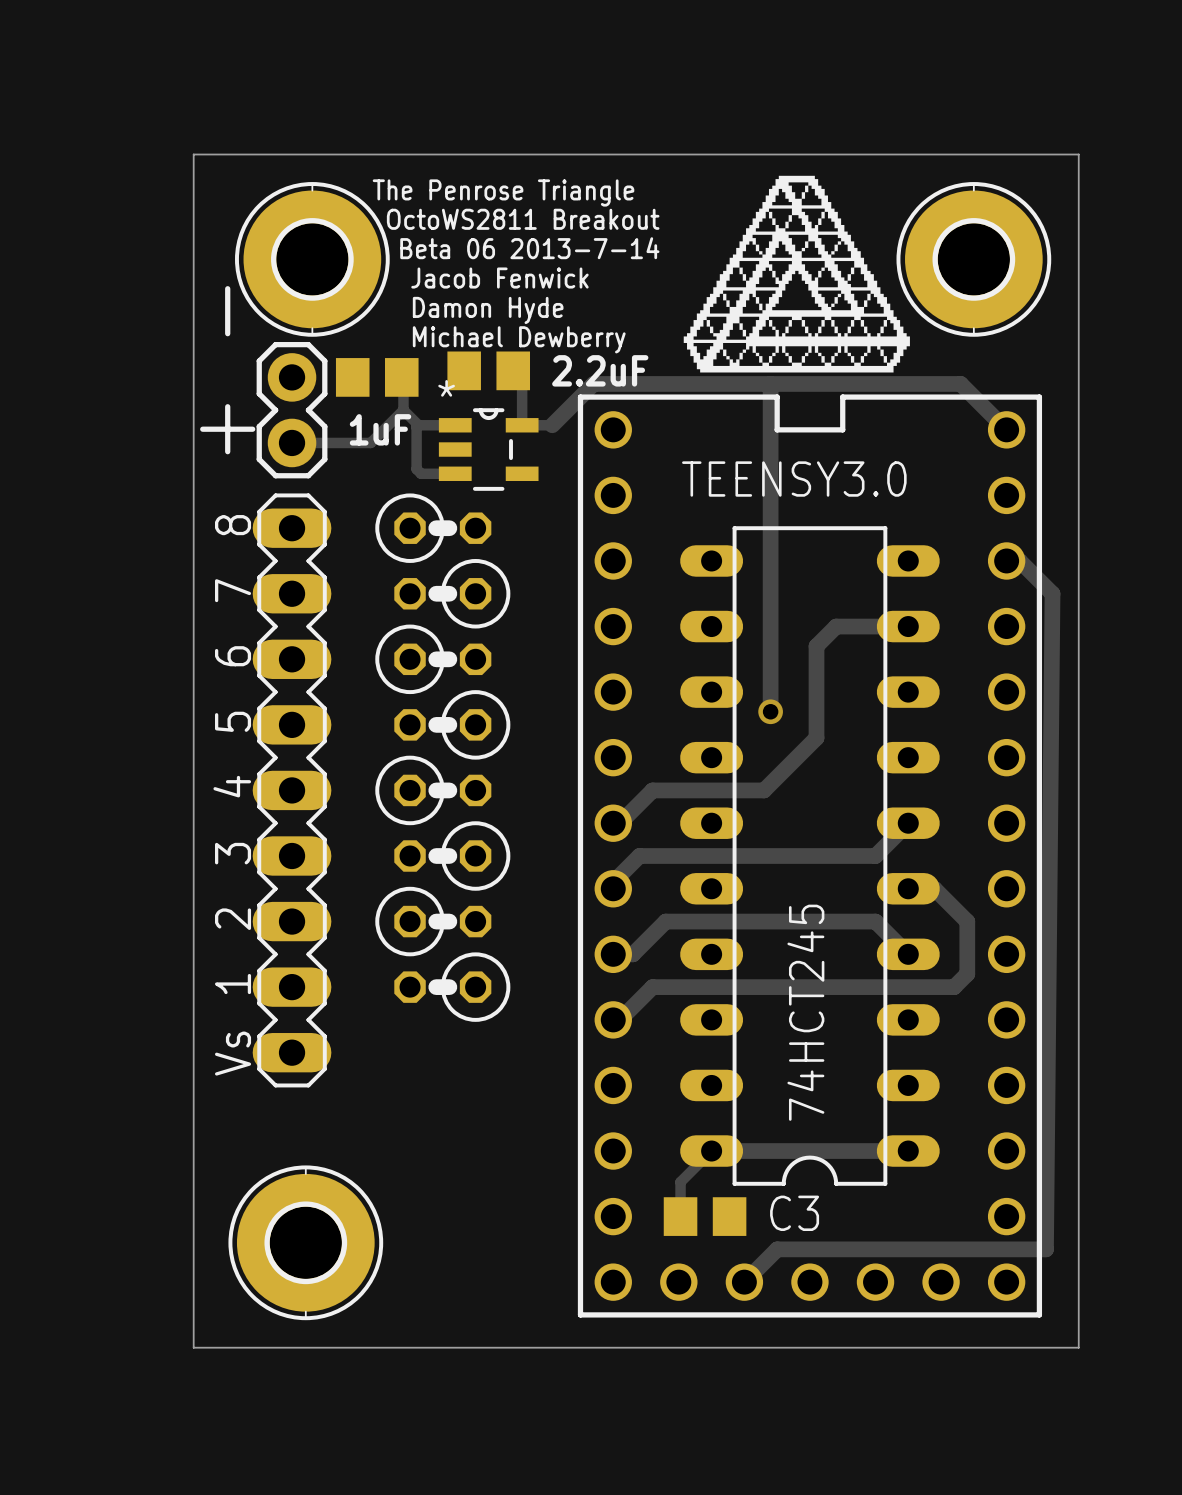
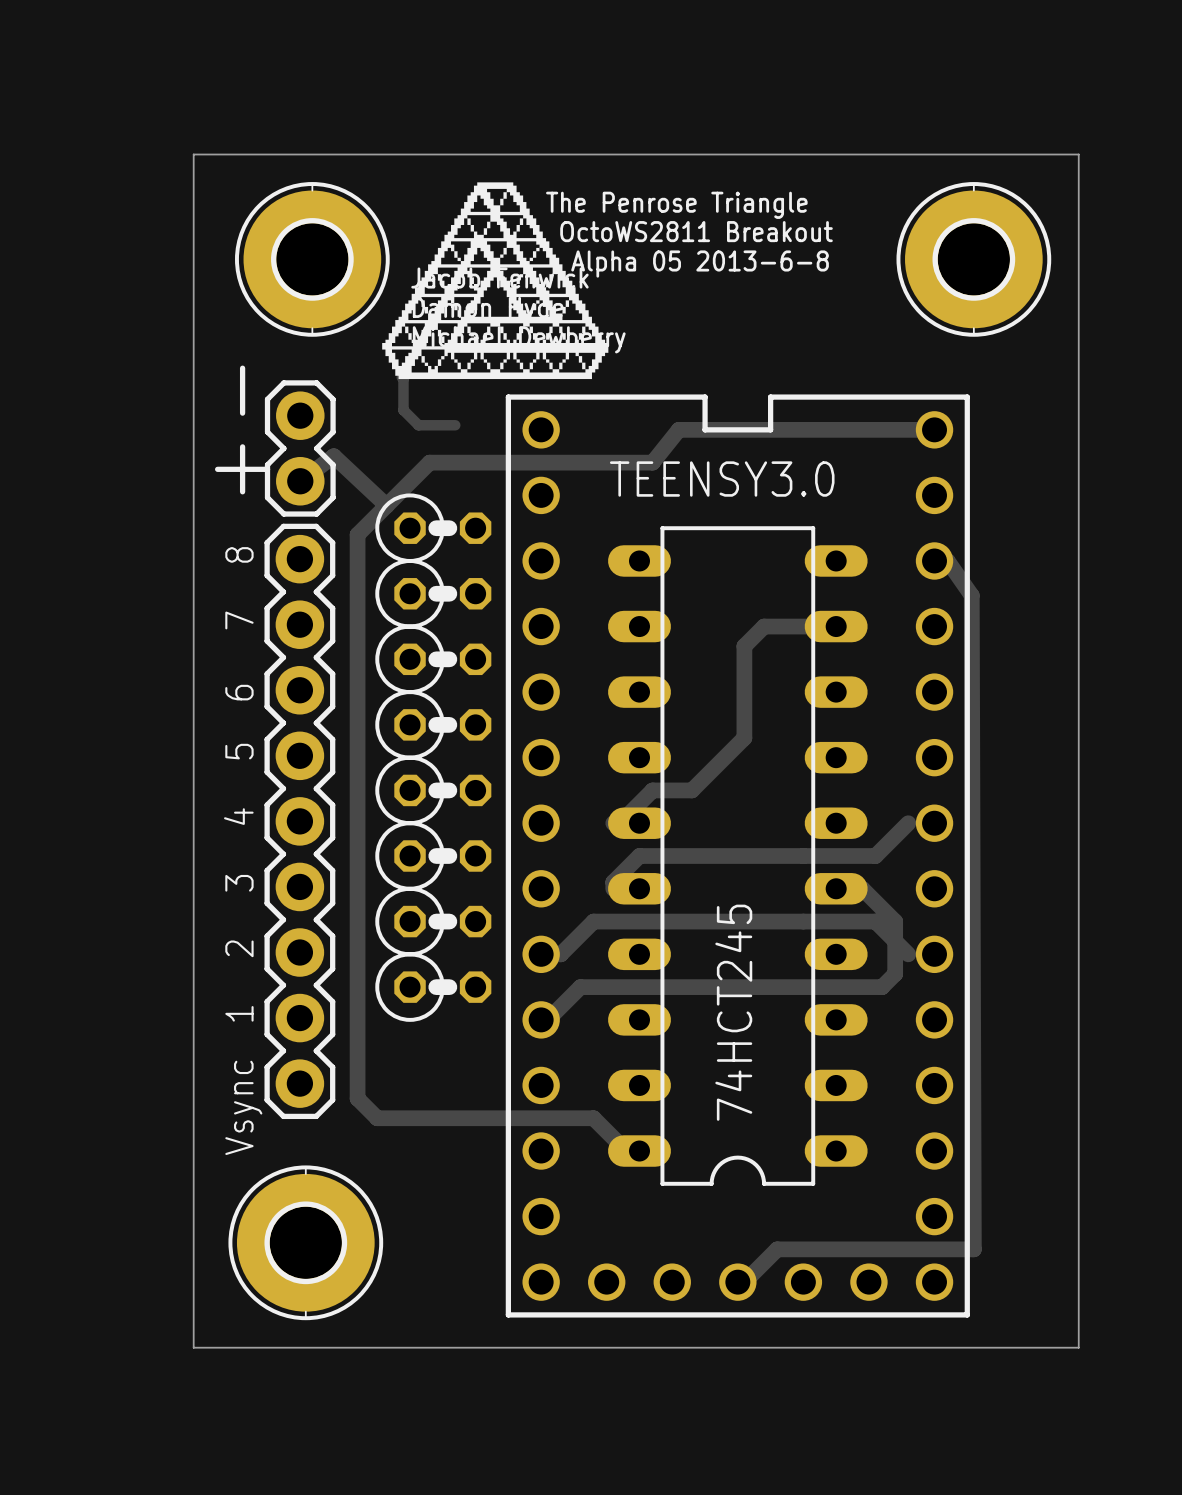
text position: The Penrose Triangle (503, 192) -> The Penrose Triangle (676, 205)
text position: OctoWS2811 Breakout (523, 219) -> OctoWS2811 Breakout (696, 231)
text: Beta 06 2013-7-14 (529, 248) -> Alpha 05 2013-6-8 (700, 264)
drawing position: (796, 274) -> (495, 280)
text: + - (227, 370) -> none
part: 2.2uF (488, 370) -> none
track: (513, 370) (522, 379) (522, 425) (552, 425) (593, 383) (960, 383) (1006, 429) -> none
part: 1uF (377, 377) -> none
track: (770, 383) (770, 711) -> none
text: none -> - (242, 390)
part position: (292, 410) -> (300, 448)
track: (403, 410) (370, 442) (292, 442) -> none
track: (418, 425) (416, 427) (416, 469) (421, 473) (455, 473) -> none
track: none -> (934, 429) (678, 429) (652, 462) (429, 462) (357, 534) (357, 1098) (377, 1118) (593, 1118) (626, 1151) (639, 1151)
part: (488, 449) -> none
text: none -> + (242, 469)
track: none -> (300, 481) (333, 456) (386, 505)
text: none -> 8 (239, 554)
track: (1006, 560) (1019, 560) (1052, 593) (1045, 1249) (973, 1249) -> (934, 560) (947, 560) (971, 595) (973, 1249)
part rotation: 0° (452, 593) -> 180° (433, 593)
text: none -> 7 (239, 620)
track: (908, 626) (836, 626) (816, 646) (816, 737) (764, 790) (691, 790) -> (836, 626) (764, 626) (744, 646) (744, 737) (691, 790)
text: none -> 6 (239, 692)
via: (770, 711) -> none
part rotation: 0° (452, 724) -> 180° (433, 724)
text: none -> 5 (239, 751)
part: (292, 790) -> none
text: none -> 4 (238, 816)
part: none -> (299, 821)
part rotation: 0° (452, 856) -> 180° (433, 856)
TEENSY3.0 position: (809, 856) -> (737, 856)
74HCT245 position: (809, 856) -> (737, 856)
text: none -> 3 (239, 883)
track: (908, 888) (934, 888) (967, 921) (967, 974) (954, 987) (882, 987) -> (836, 888) (862, 888) (895, 921) (895, 974) (882, 987)
track: (665, 921) (632, 954) (613, 954) -> (665, 921) (593, 921) (560, 954) (541, 954)
text: none -> 2 (239, 948)
part rotation: 0° (452, 987) -> 180° (433, 987)
track: (652, 987) (619, 1019) (613, 1019) -> (652, 987) (580, 987) (547, 1019) (541, 1019)
text: none -> 1 (239, 1013)
text: none -> Vsync (243, 1107)
track: (908, 1151) (711, 1151) (680, 1182) (680, 1216) -> none
C3: (705, 1216) -> none

